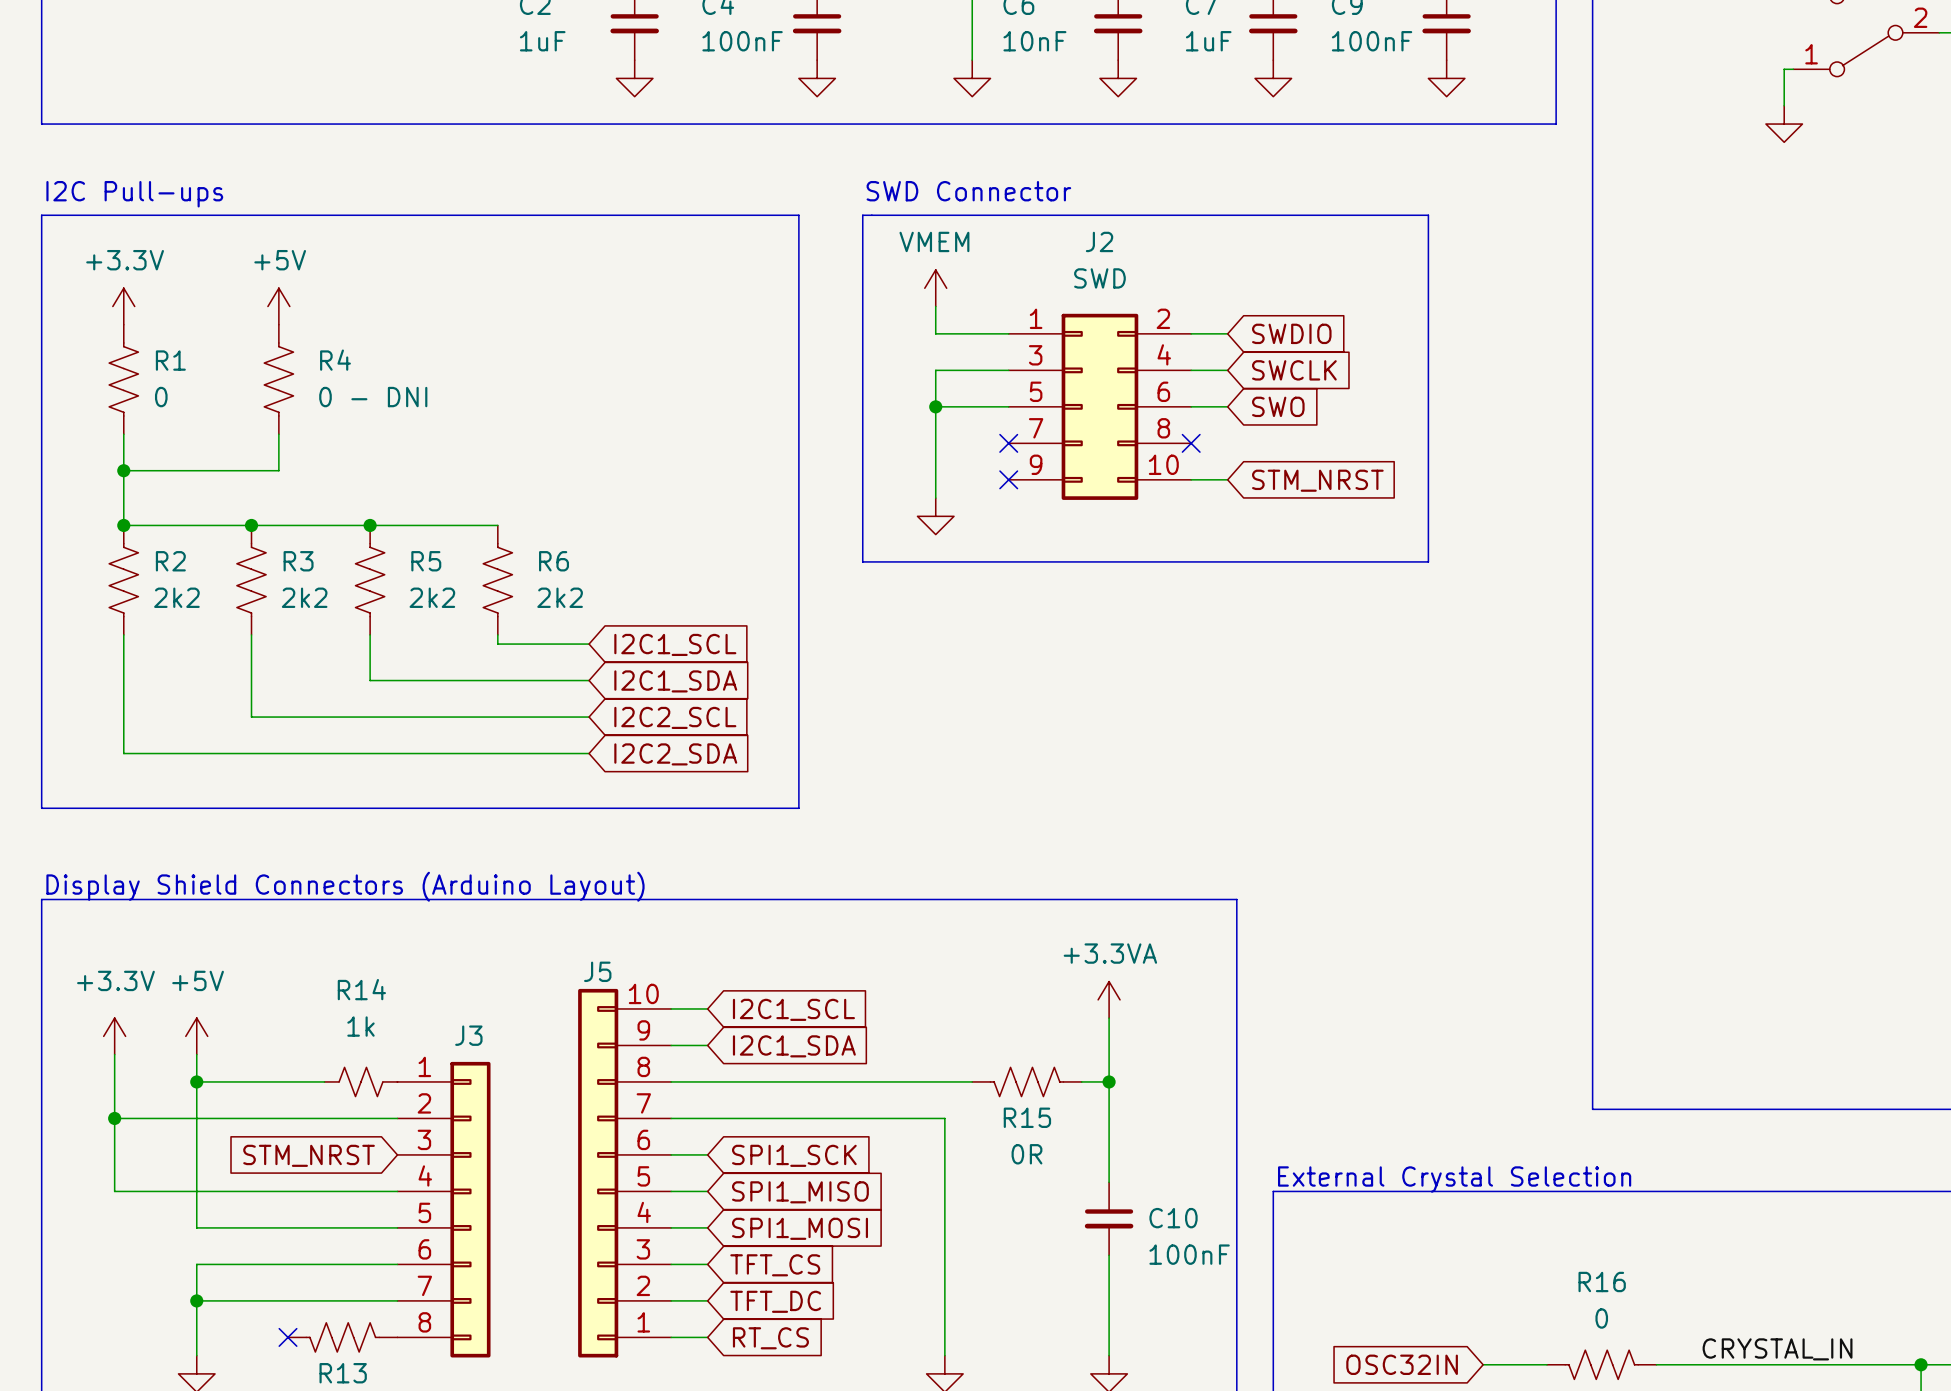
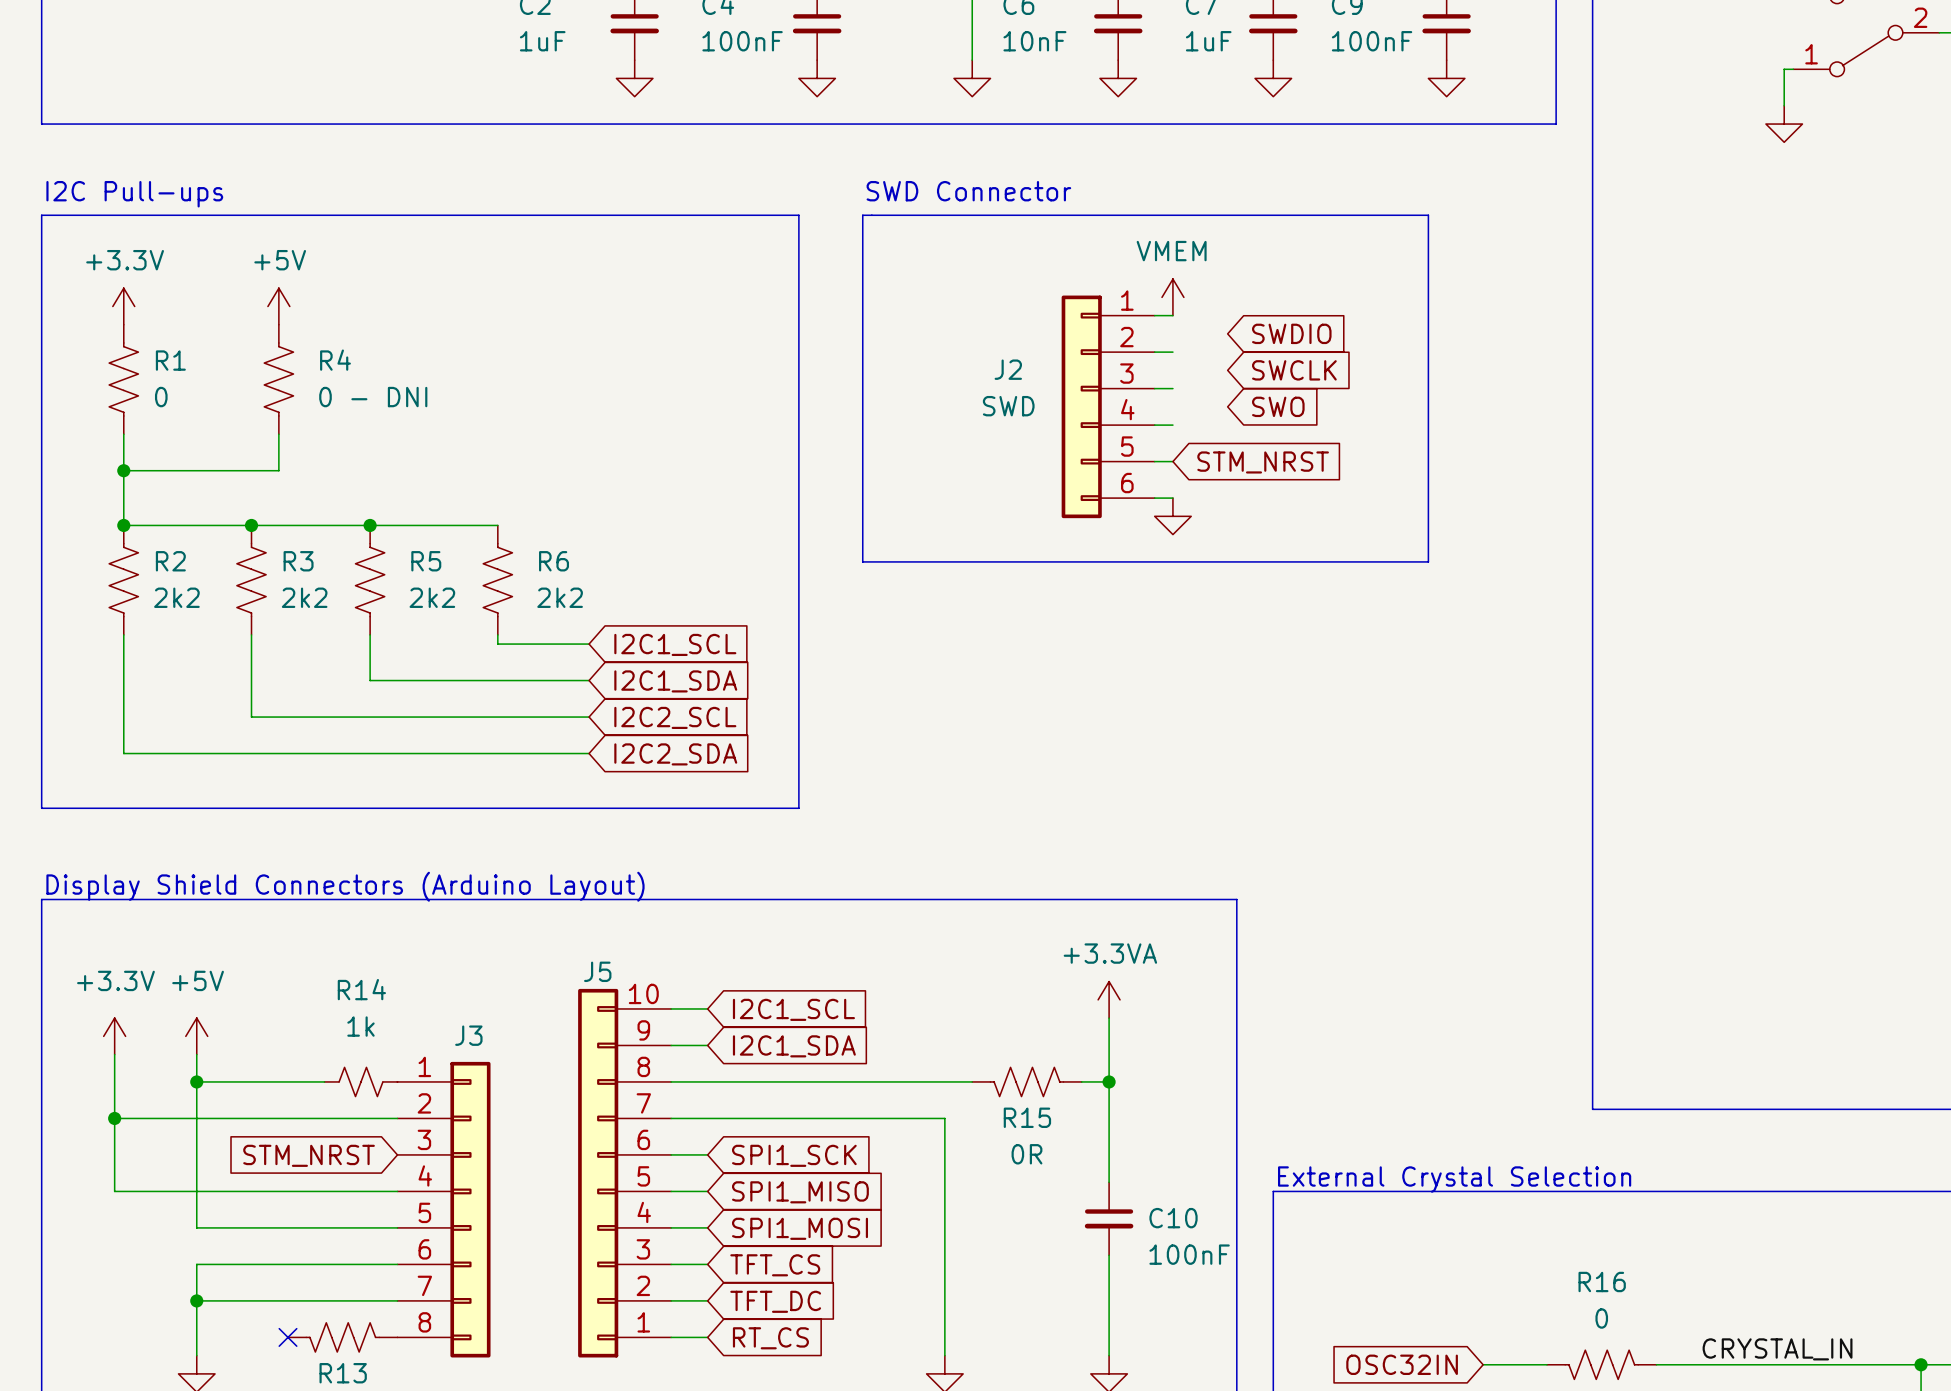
J2 name position: J2 (1099, 241) -> J2 (1008, 369)
J2 value position: SWD (1099, 278) -> SWD (1008, 406)
power symbol position: VMEM (935, 288) -> VMEM (1172, 297)
wire: (935, 306) (935, 333) (1008, 333) -> none
J2 symbol: [1008, 313, 1192, 500] -> [1061, 295, 1155, 519]
wire: none -> (1154, 315) (1172, 315)
wire: (1191, 333) (1227, 333) -> none
wire: none -> (1154, 352) (1172, 352)
wire: (1008, 370) (935, 370) (935, 498) -> none
wire: (1191, 370) (1227, 370) -> none
wire: none -> (1154, 388) (1172, 388)
wire: (935, 406) (1008, 406) -> none
junction: (935, 406) -> none
wire: (1191, 406) (1227, 406) -> none
wire: none -> (1154, 425) (1172, 425)
no-connect mark: (1008, 443) -> none
no-connect mark: (1191, 443) -> none
wire: none -> (1154, 461) (1172, 461)
no-connect mark: (1008, 479) -> none
global label position: STM_NRST (1317, 480) -> STM_NRST (1263, 462)
wire: none -> (1154, 498) (1172, 498)
power symbol position: (935, 516) -> (1172, 516)

